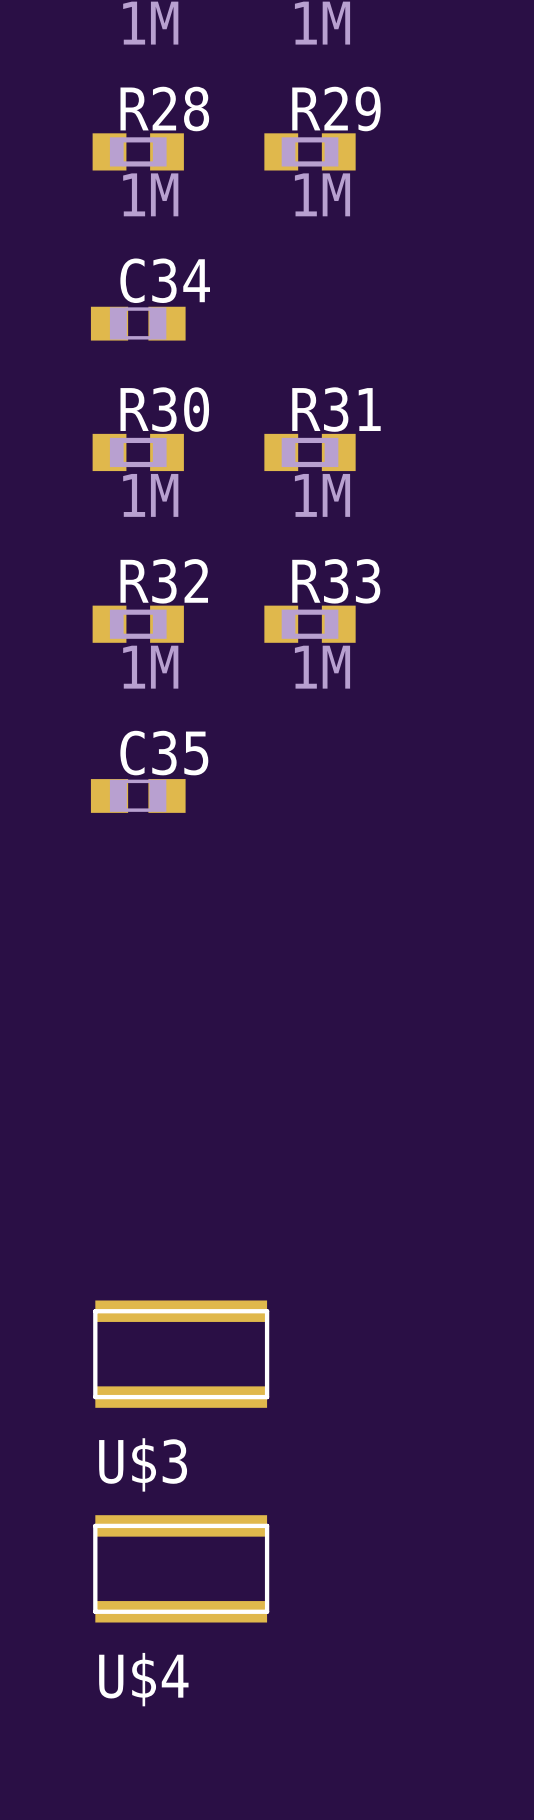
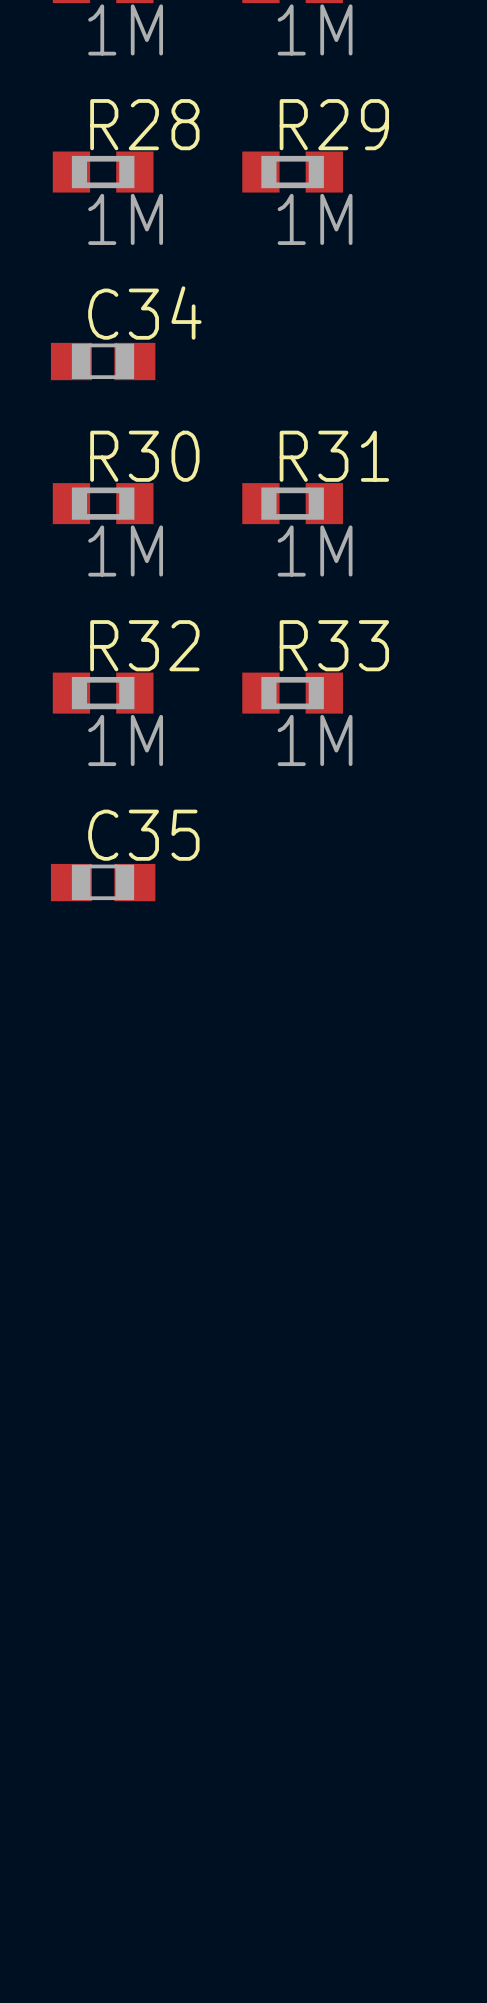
U$3: (181, 1354) -> none
U$4: (181, 1568) -> none

